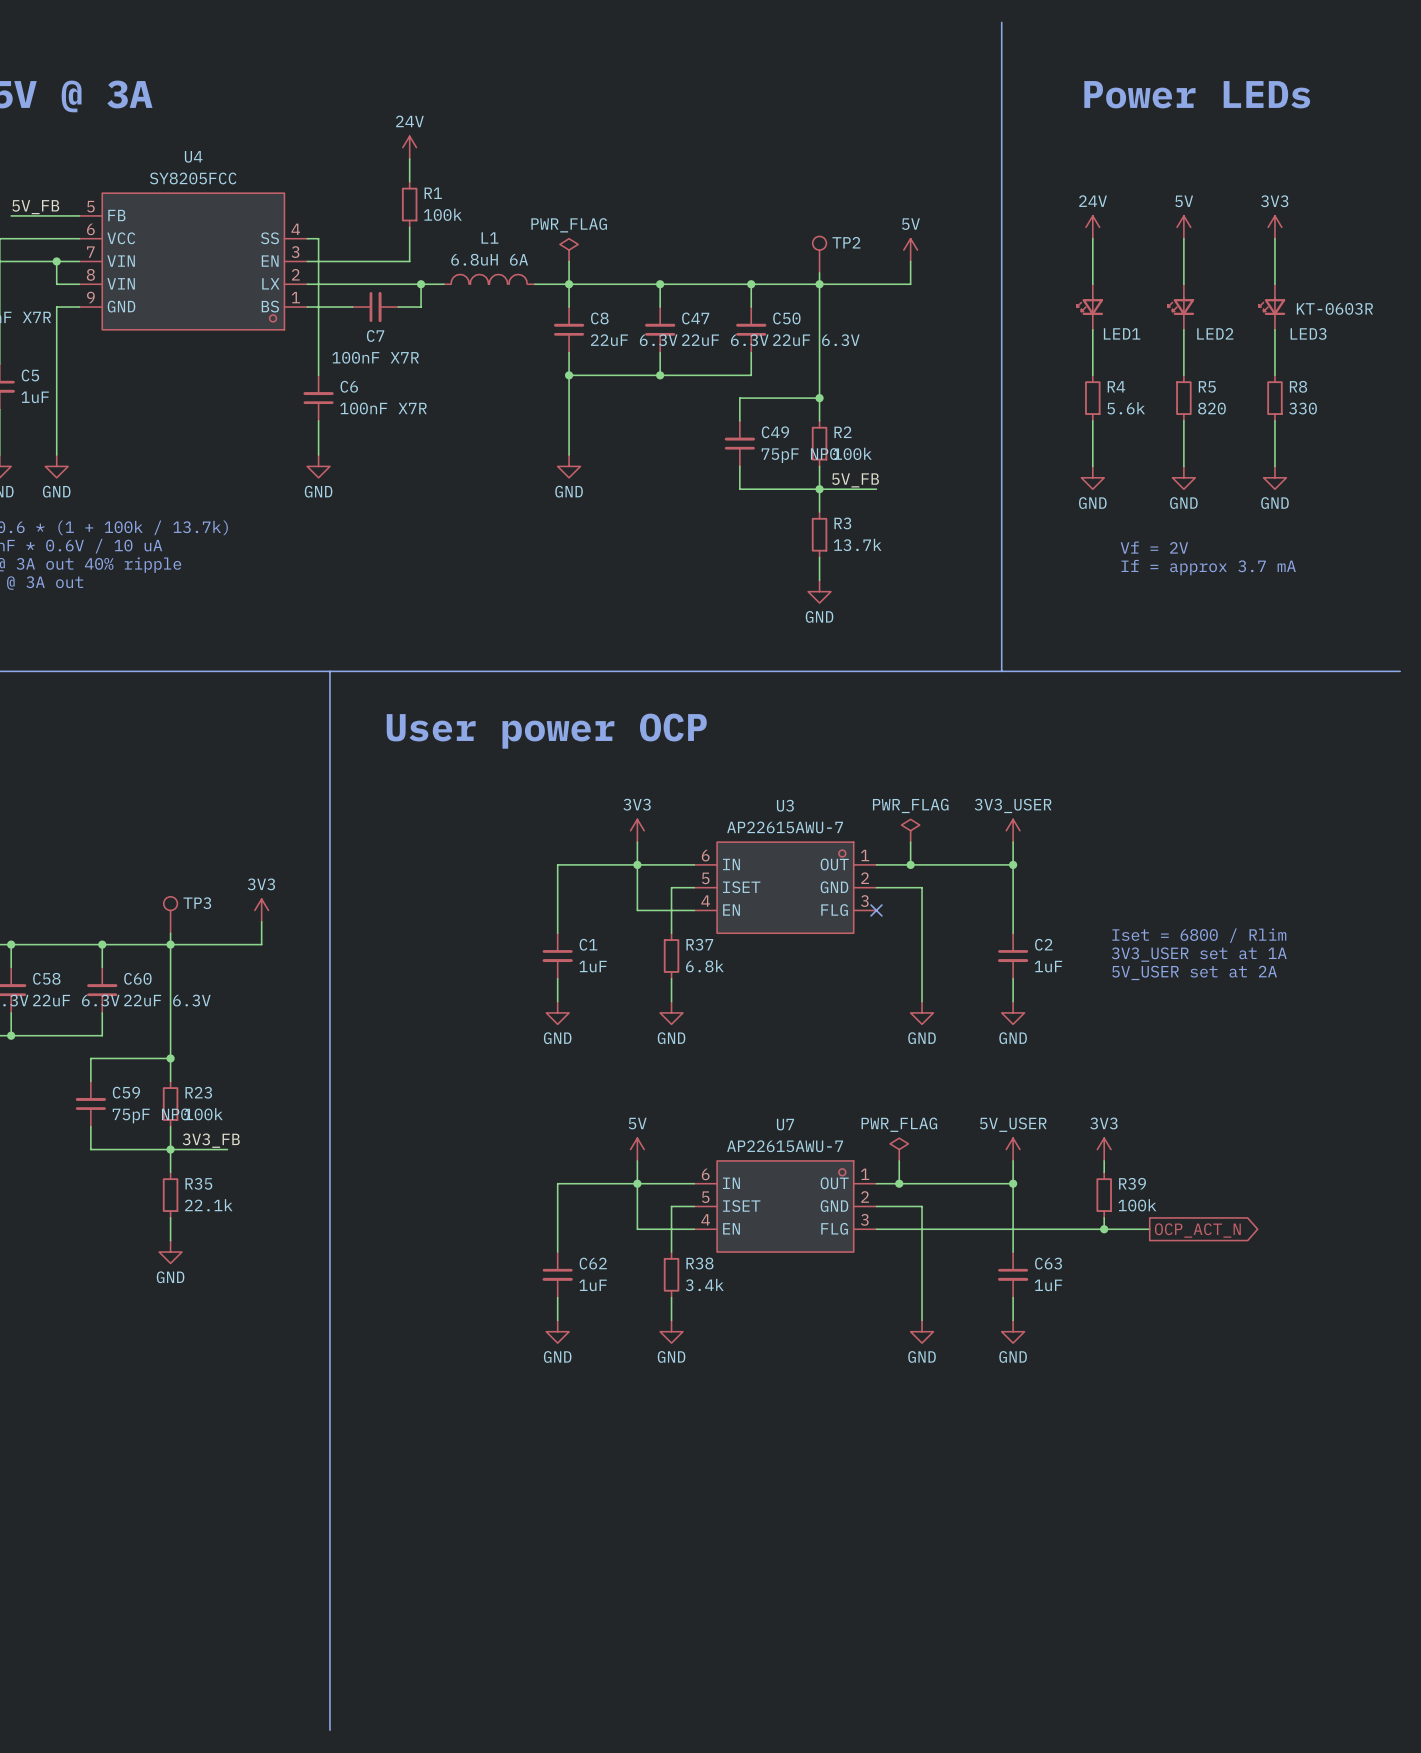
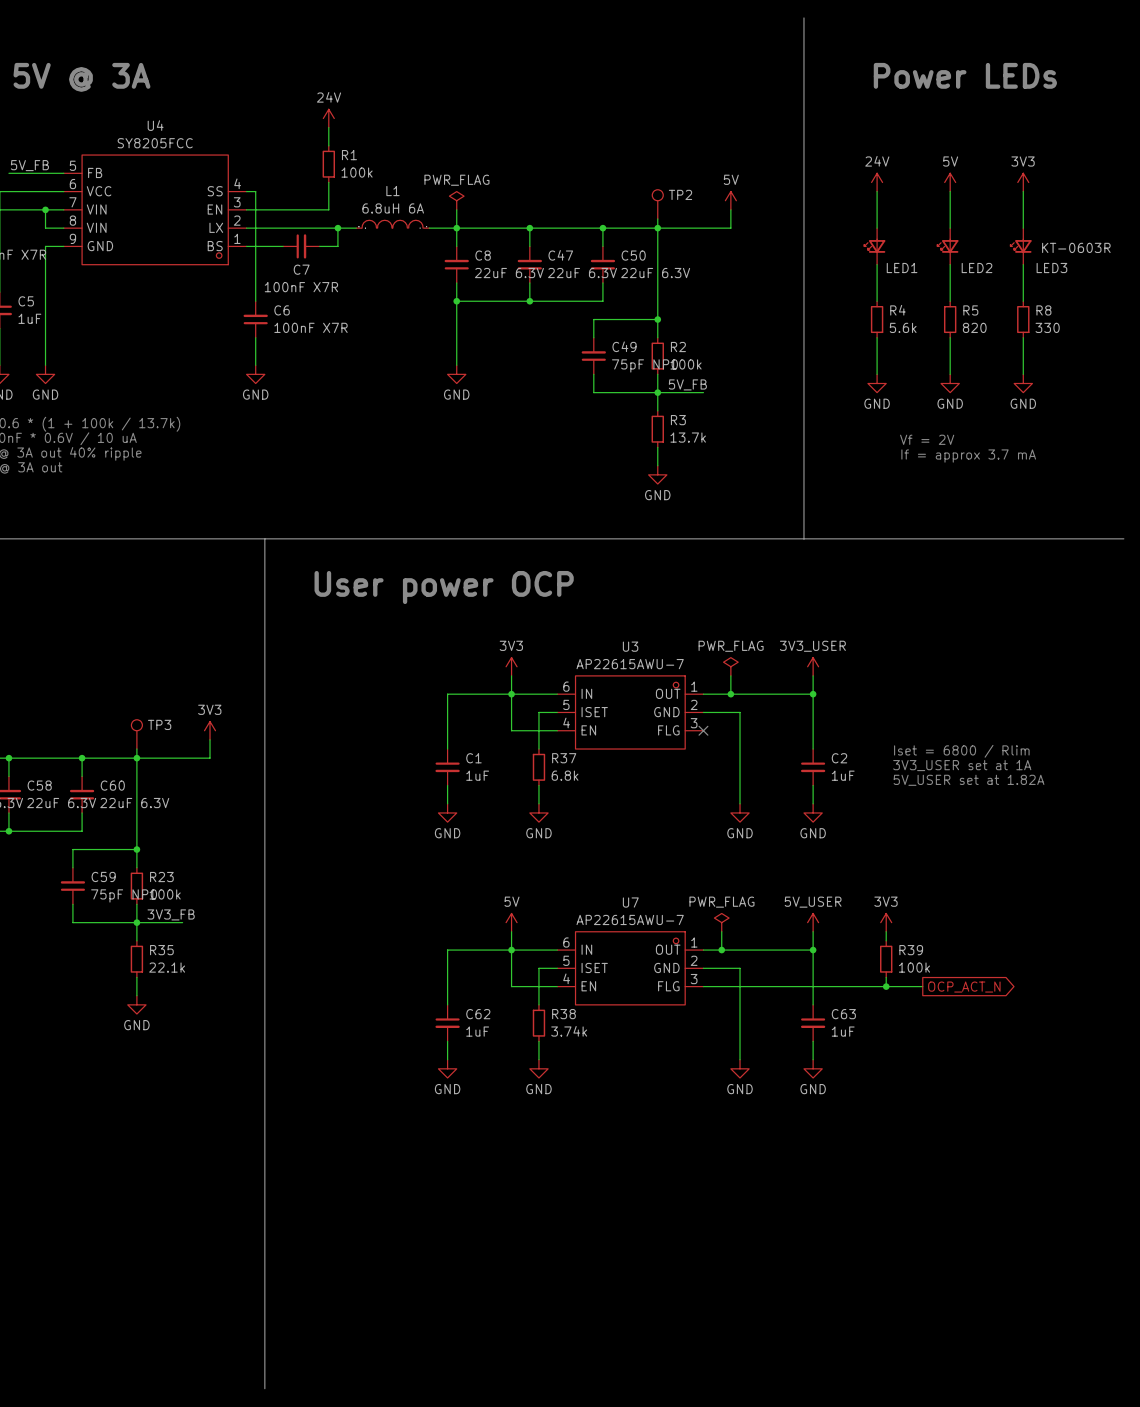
text: 5V_USER set at 2A (1194, 972) -> 5V_USER set at 1.82A (969, 780)
R38 value: 3.4k (704, 1284) -> 3.74k (569, 1031)

